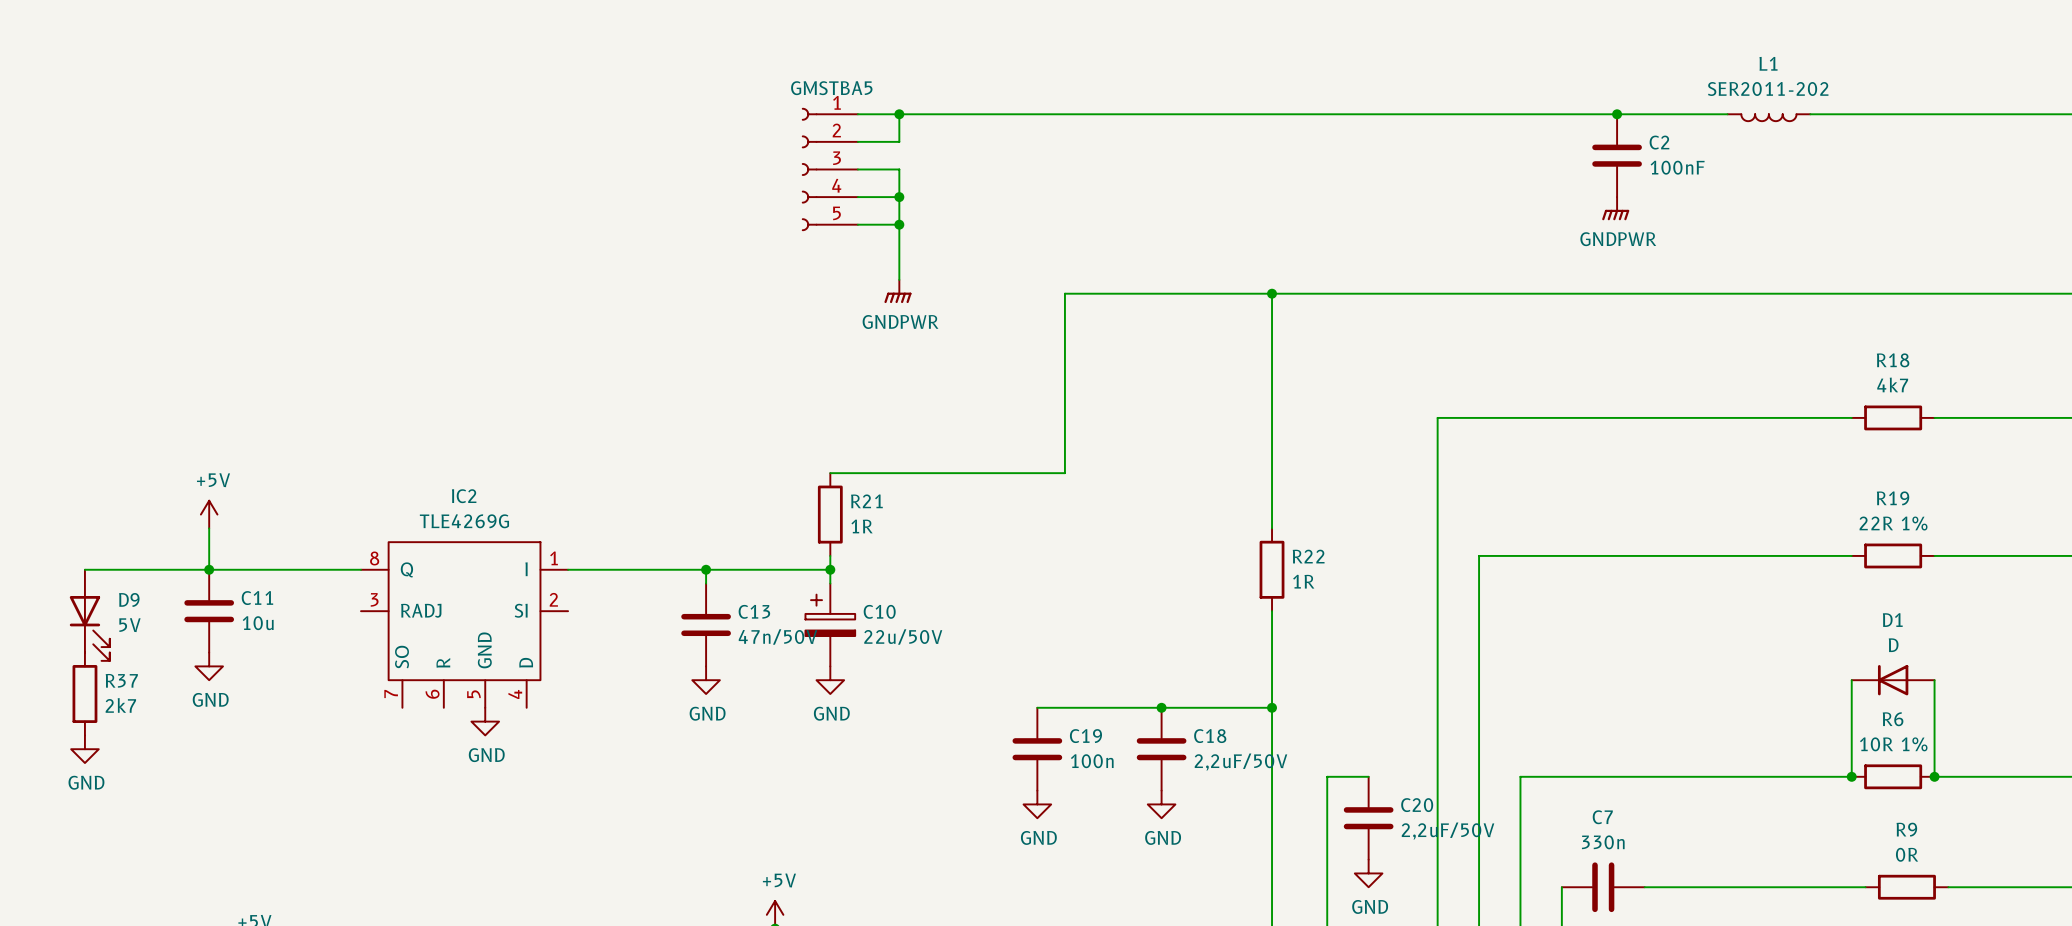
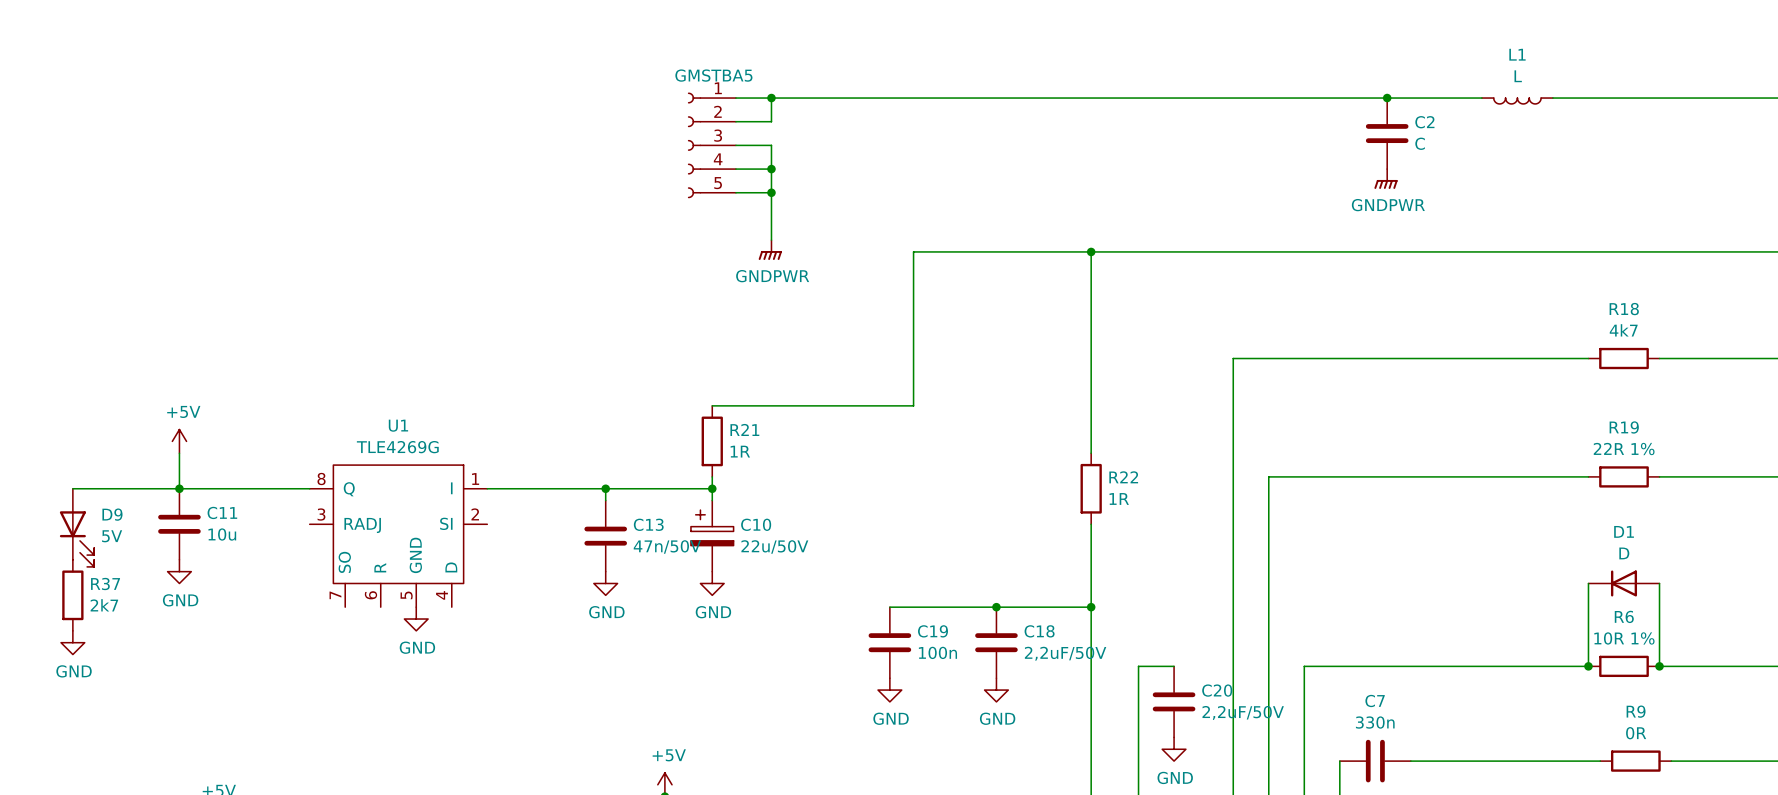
L1 value: SER2011-202 (1768, 88) -> L (1518, 76)
C2 value: 100nF (1677, 167) -> C (1420, 143)
IC2 name: IC2 (464, 496) -> U1 (398, 425)

